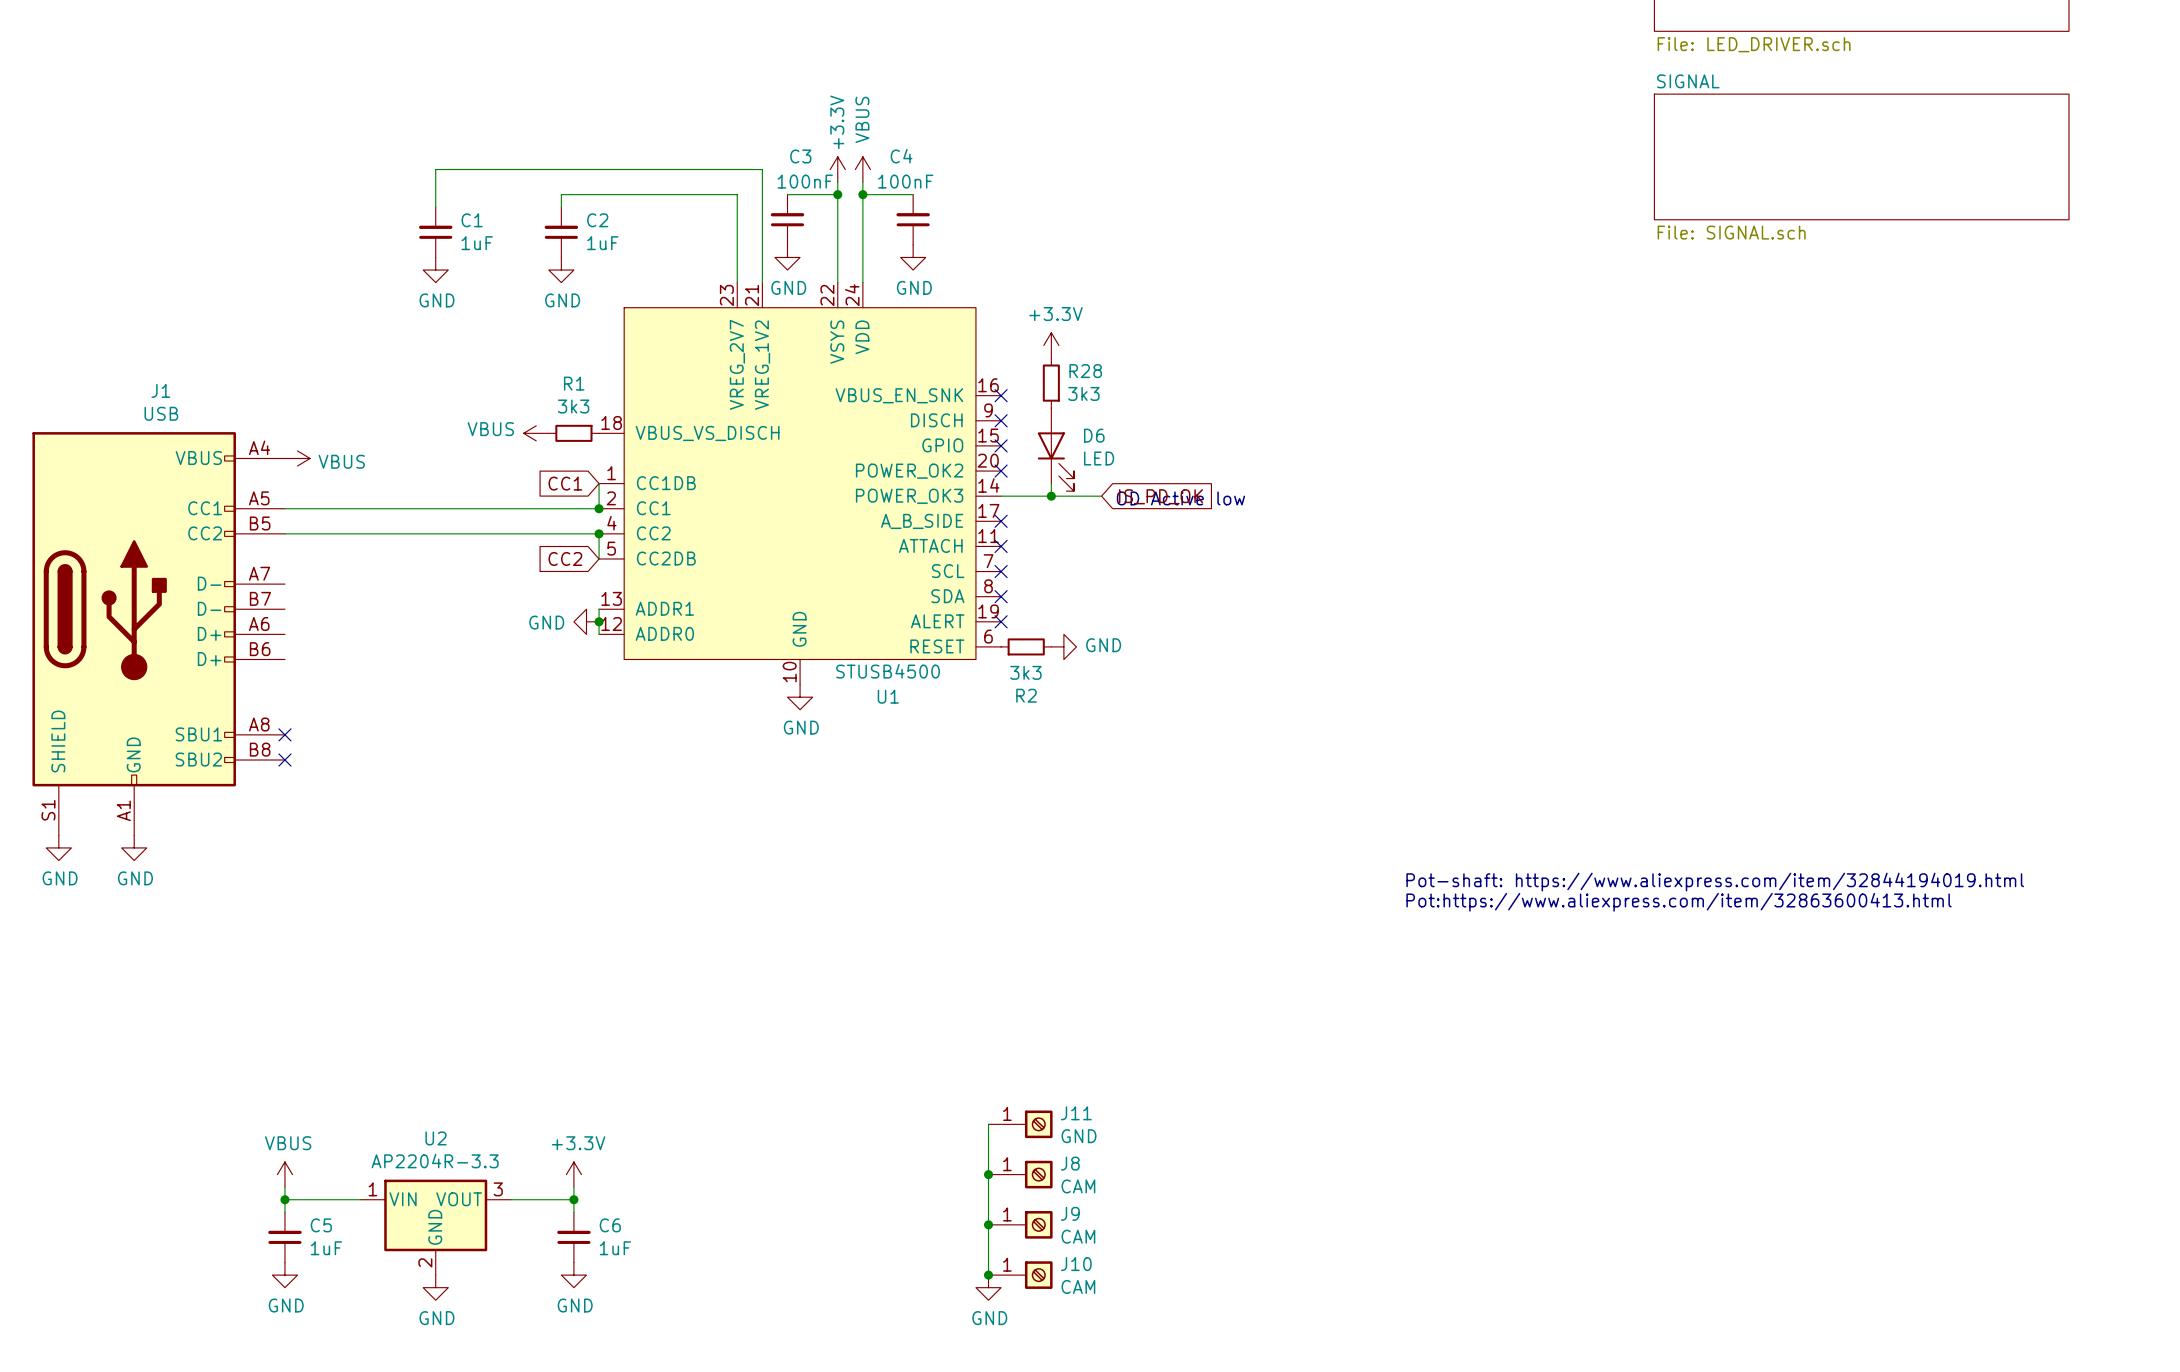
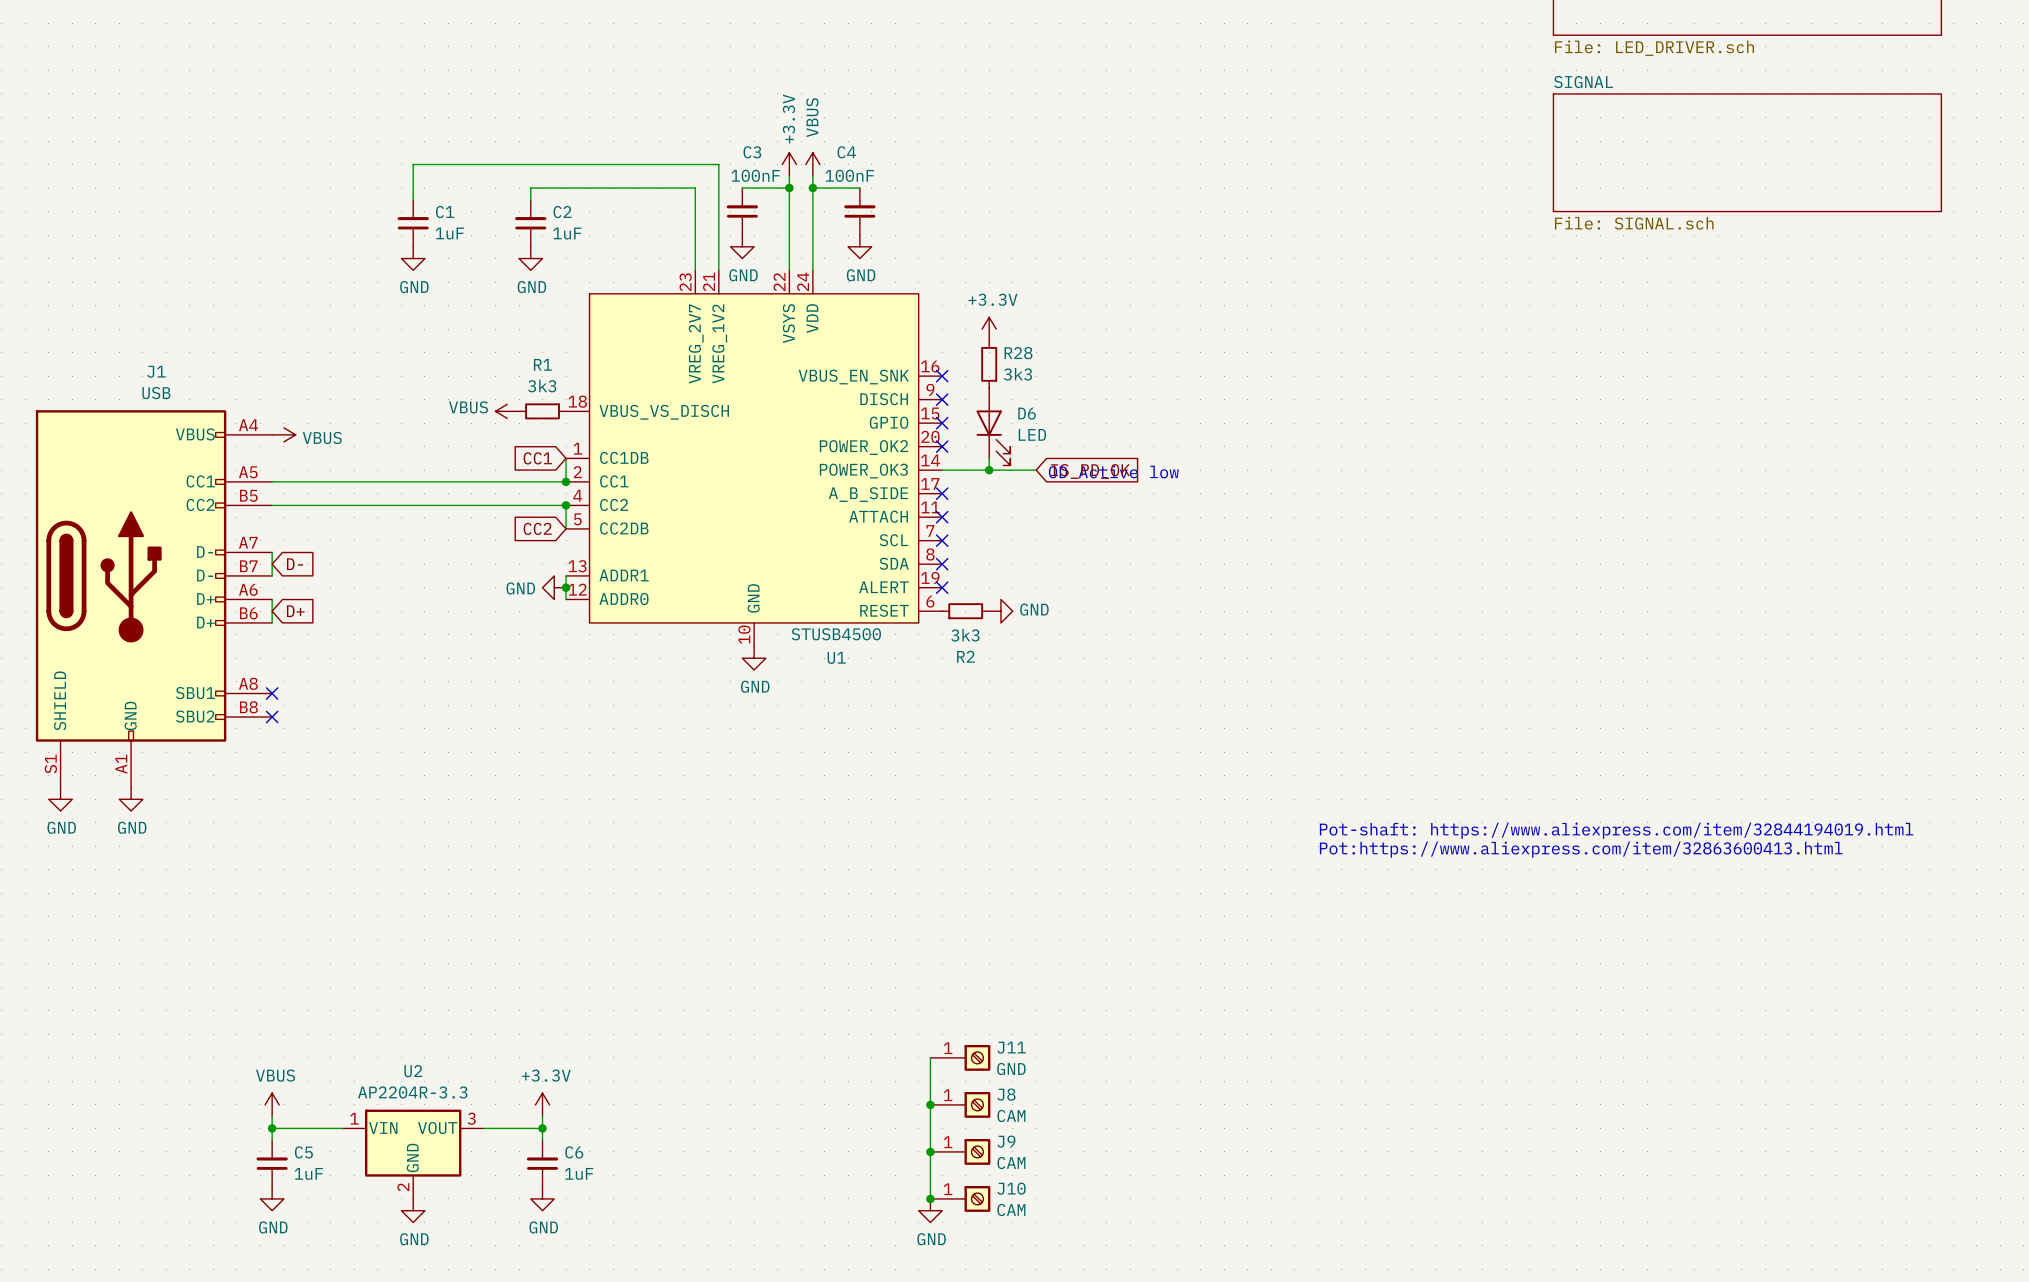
wire: none -> (272, 552) (272, 575)
global label: none -> D- (294, 564)
wire: none -> (272, 599) (272, 622)
global label: none -> D+ (295, 611)

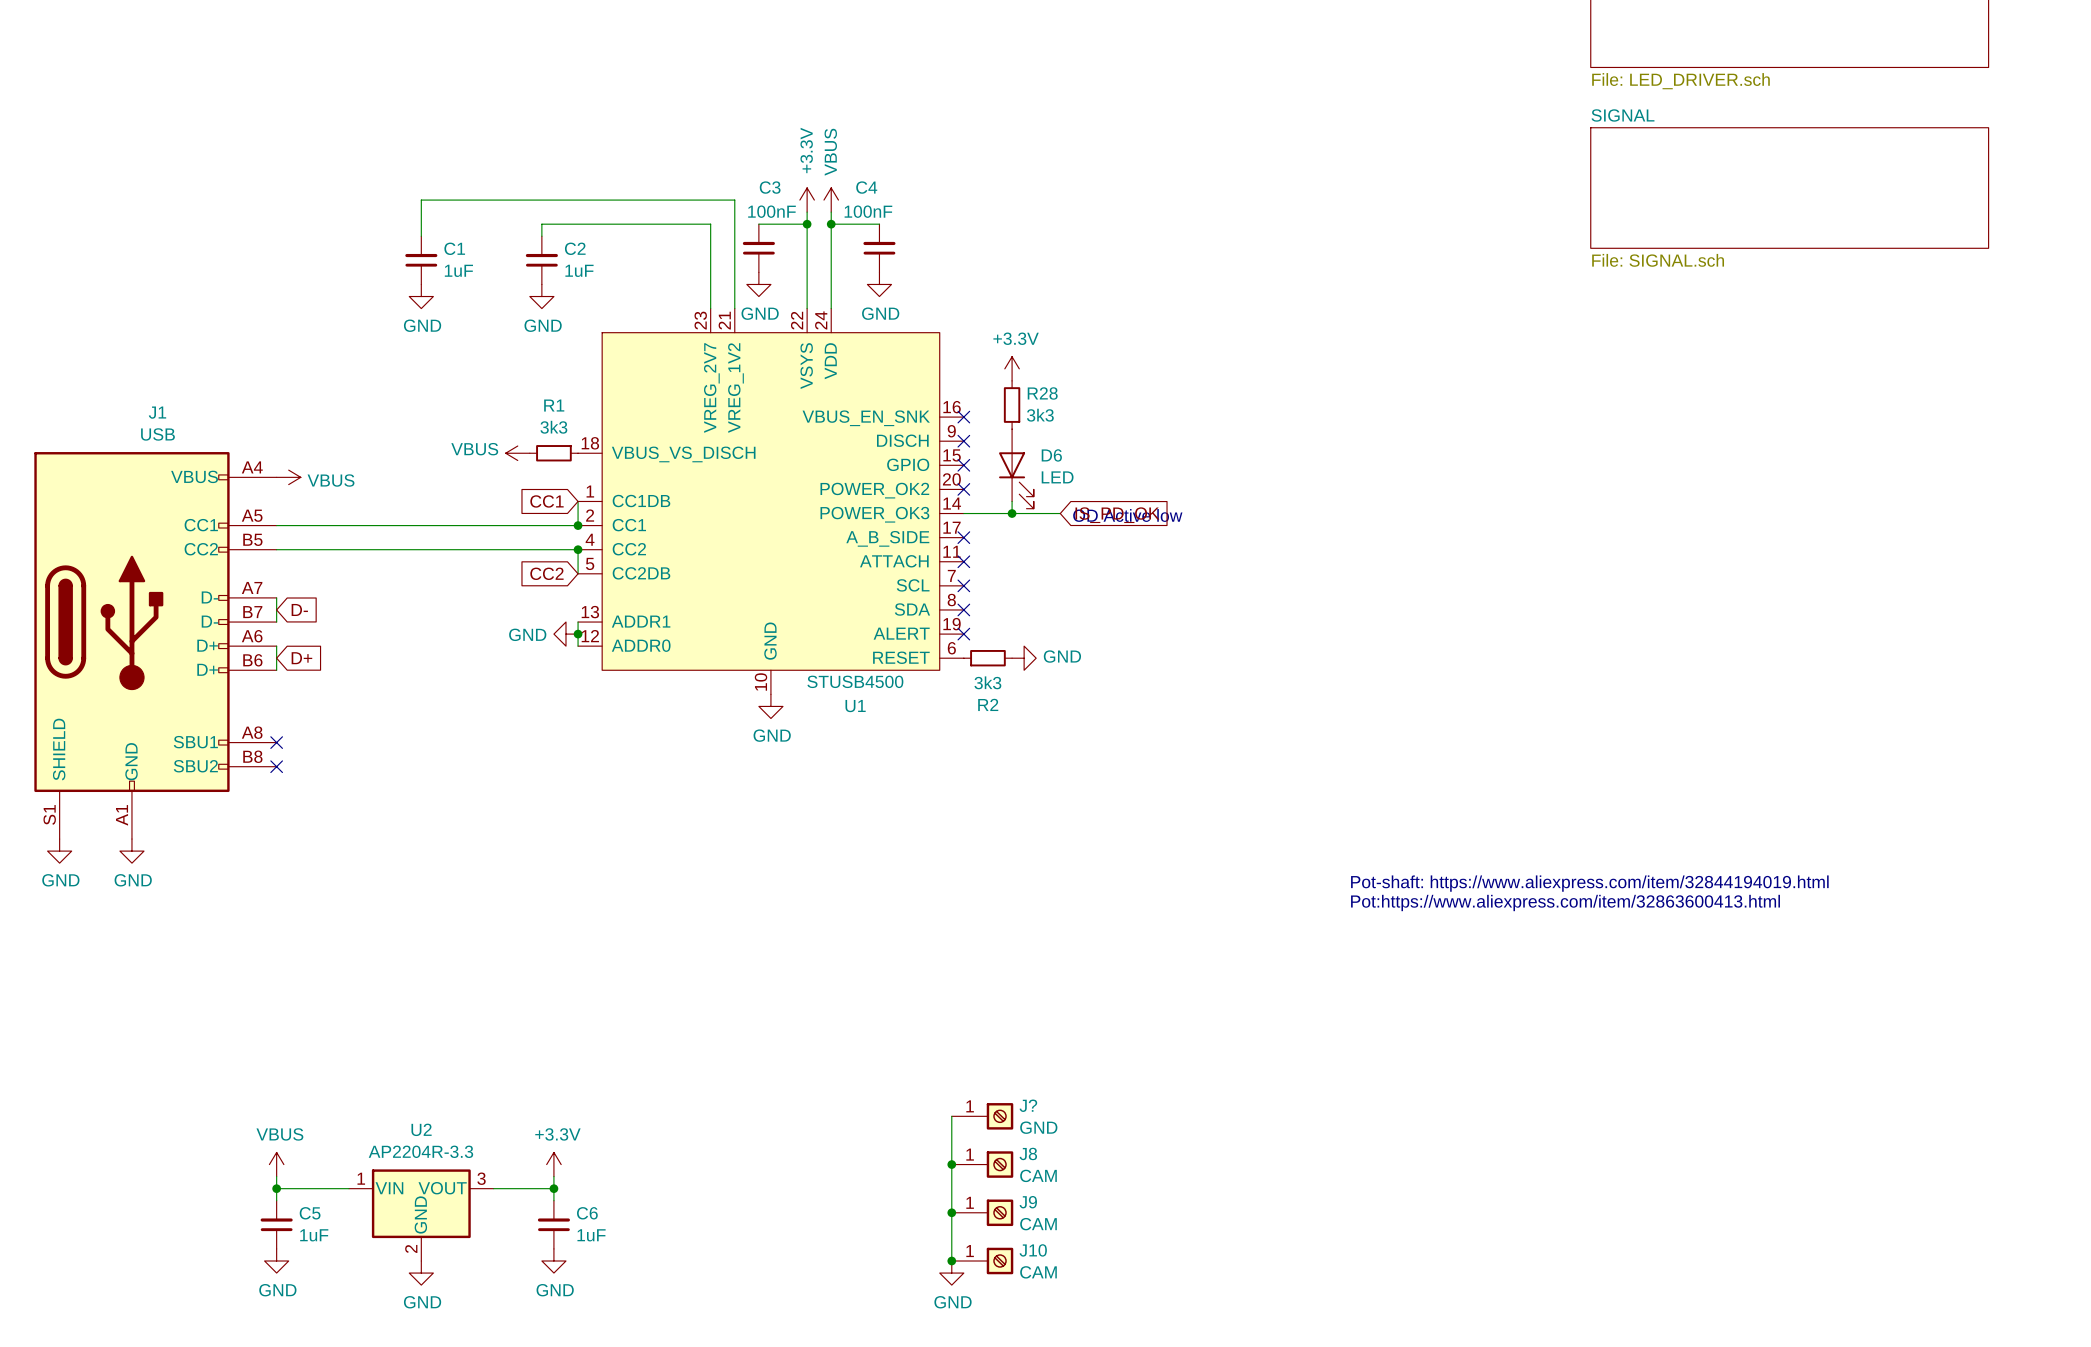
J11 name: J11 (1011, 1047) -> J? (1028, 1105)

